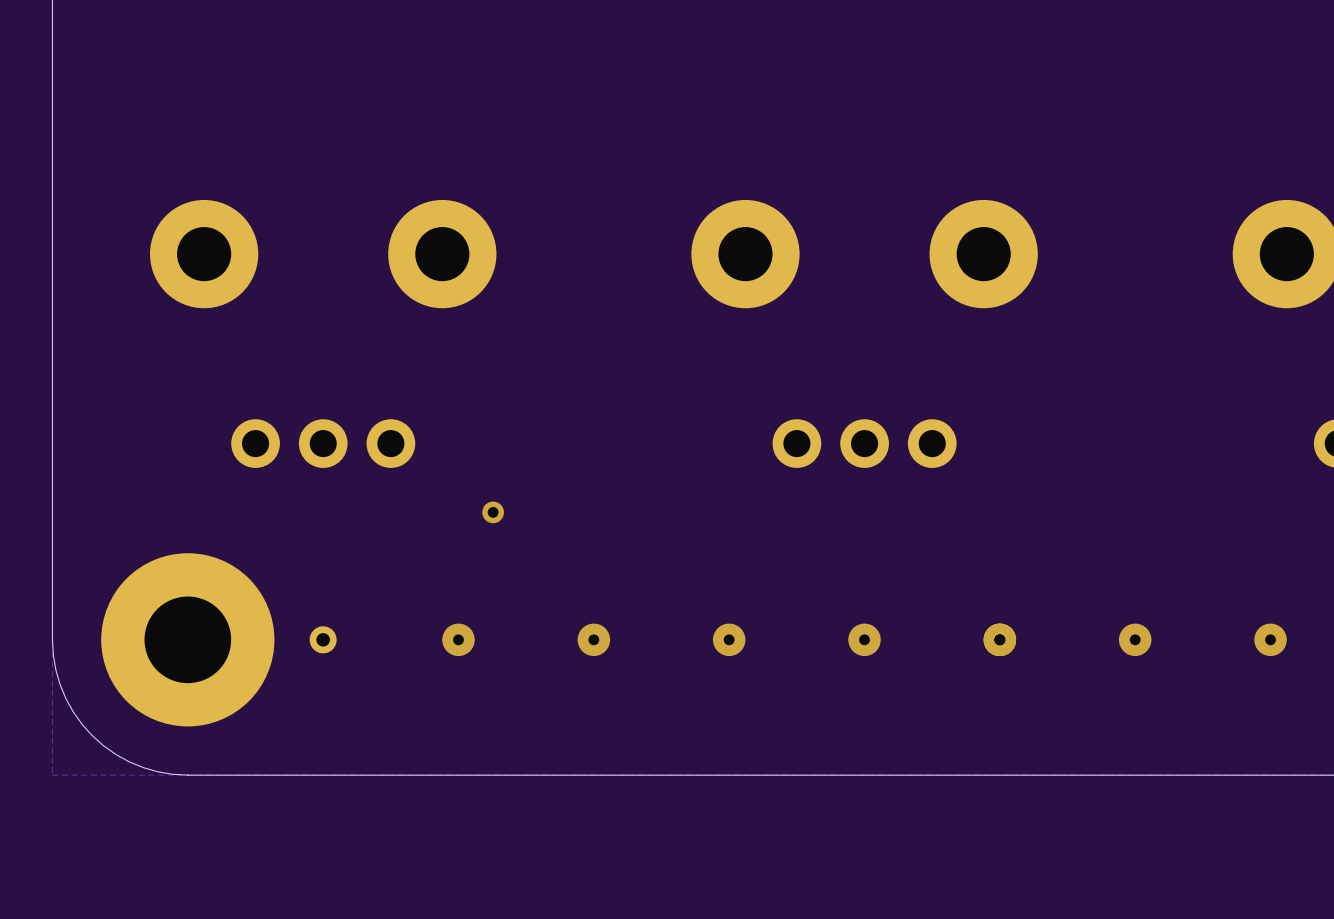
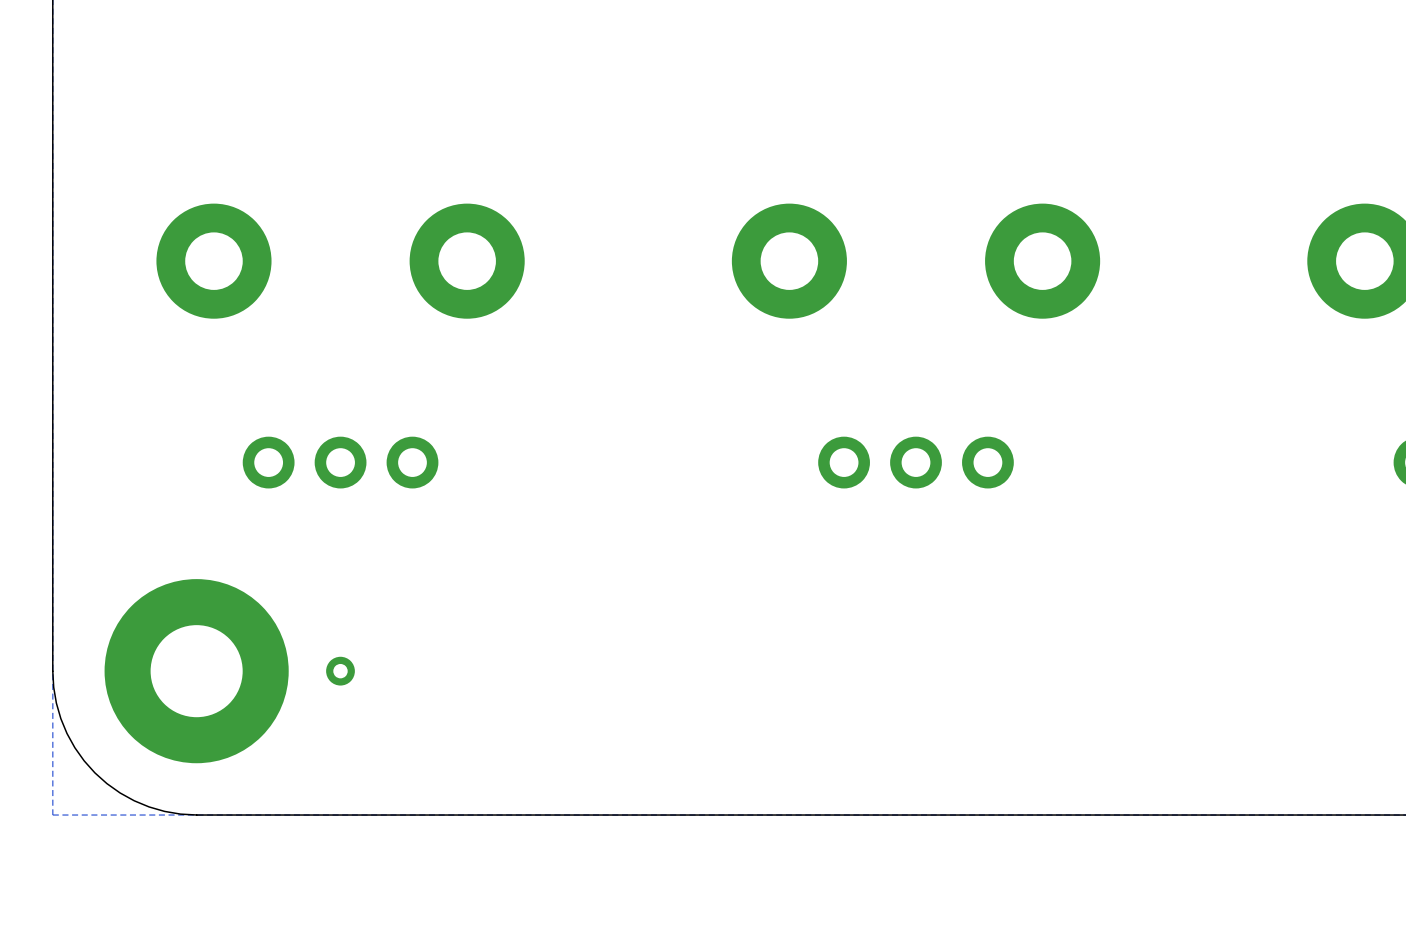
via: (493, 512) -> none
via: (458, 639) -> none
via: (593, 639) -> none
via: (729, 639) -> none
via: (864, 639) -> none
via: (999, 639) -> none
via: (1135, 639) -> none
via: (1270, 639) -> none

